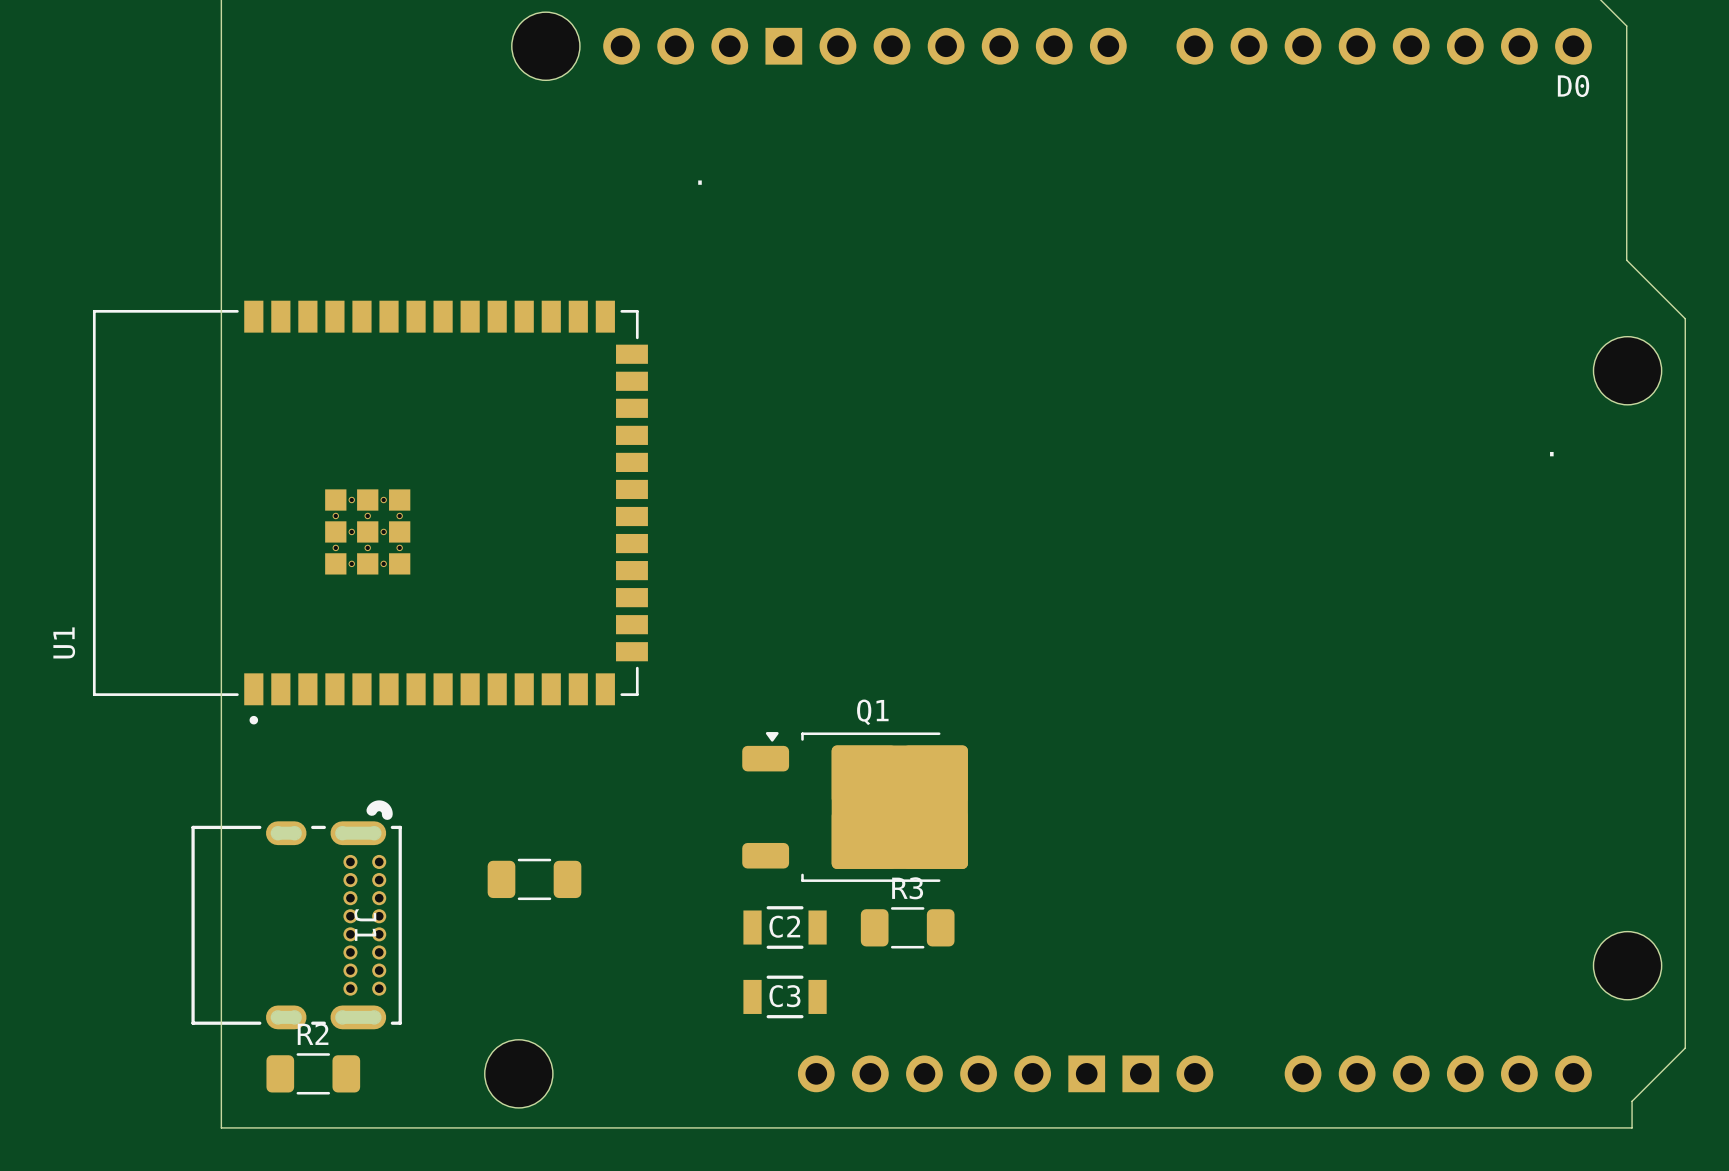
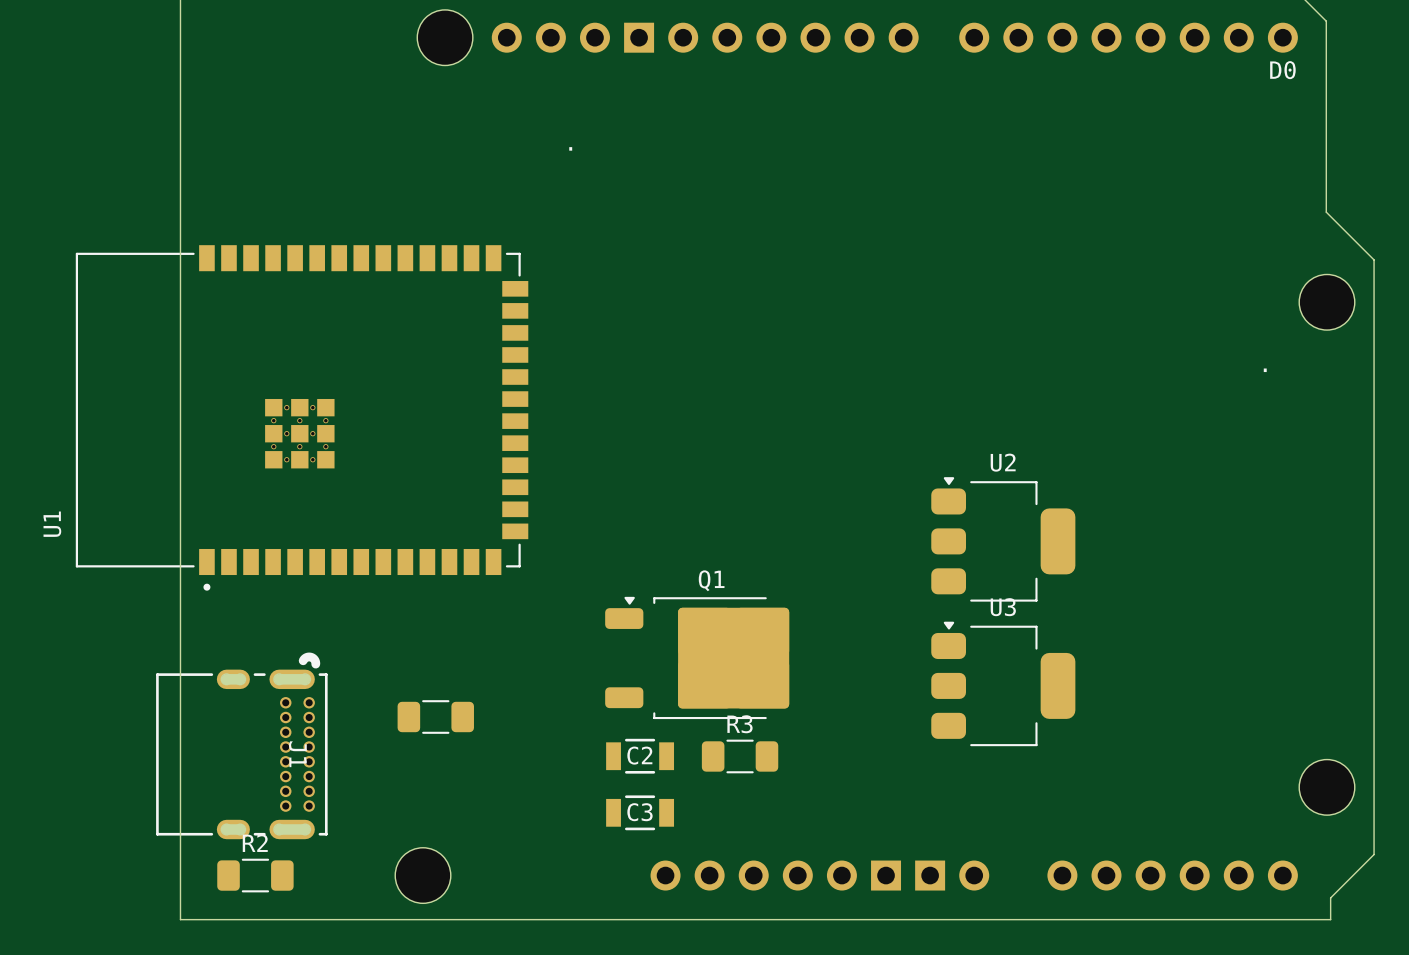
U2: none -> (1003, 539)
U3: none -> (1003, 683)

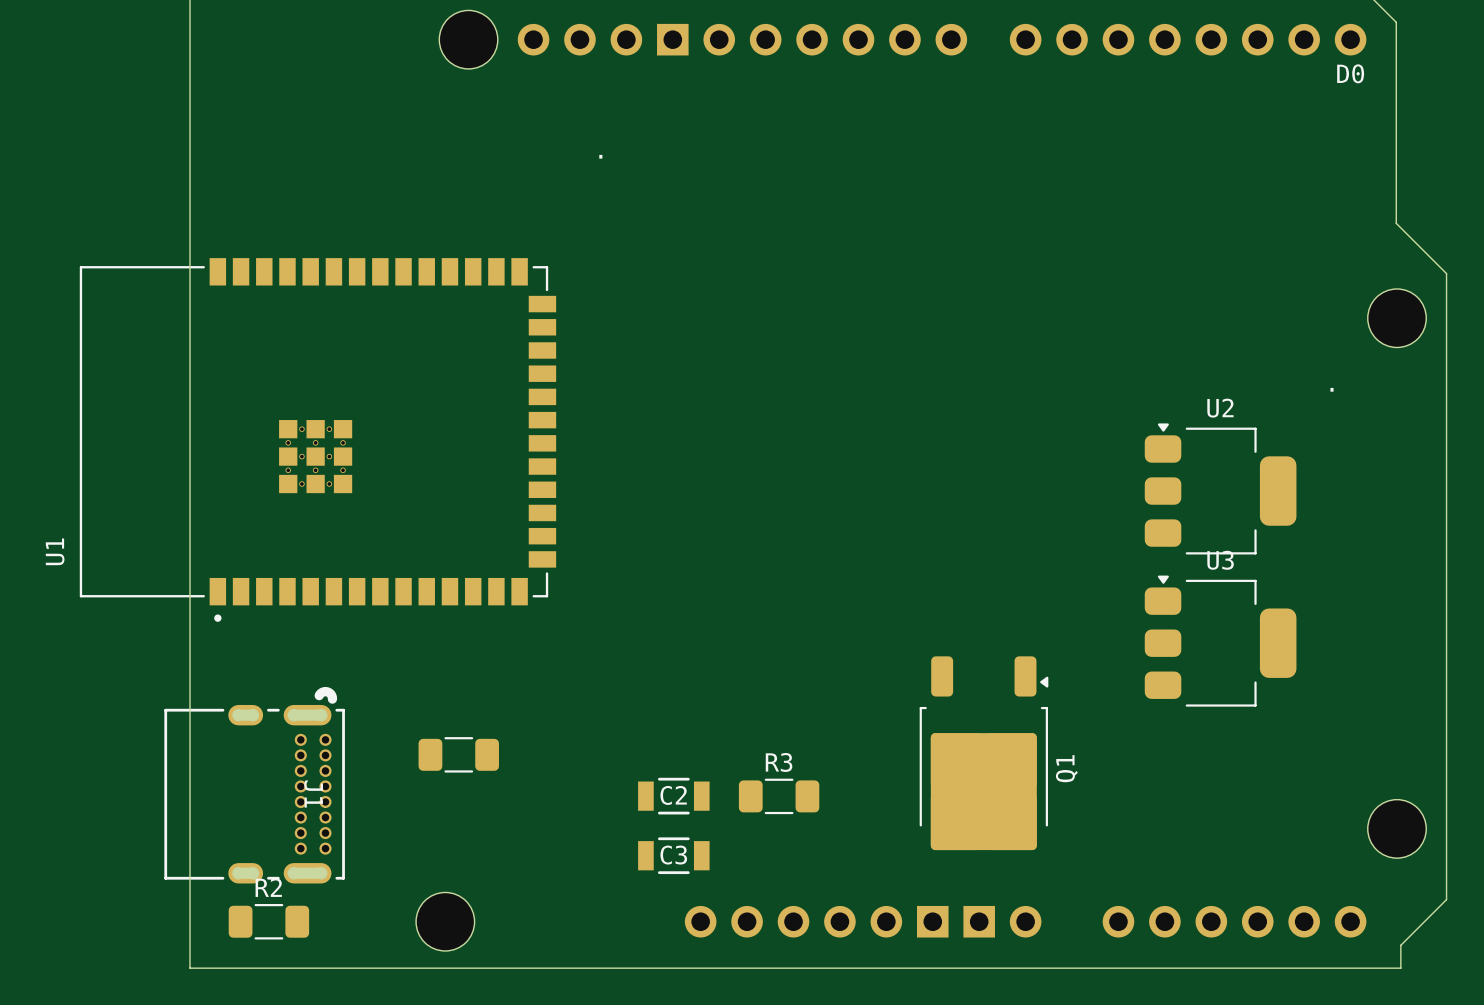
U2 position: (1003, 539) -> (1220, 488)
Q1 rotation: 0° (697, 657) -> 90° clockwise (984, 753)
Q1 position: (697, 657) -> (984, 753)
U3 position: (1003, 683) -> (1220, 641)

